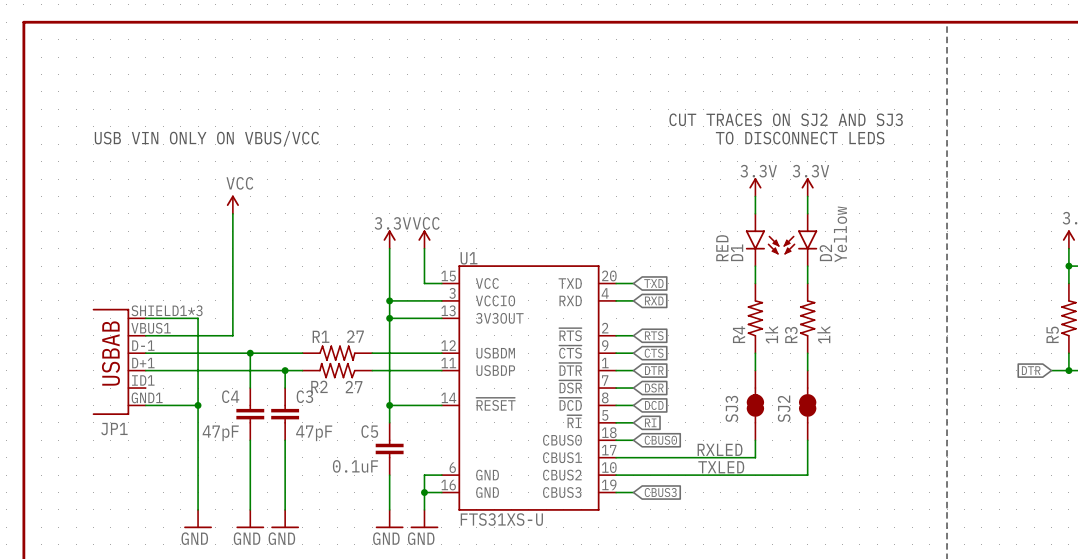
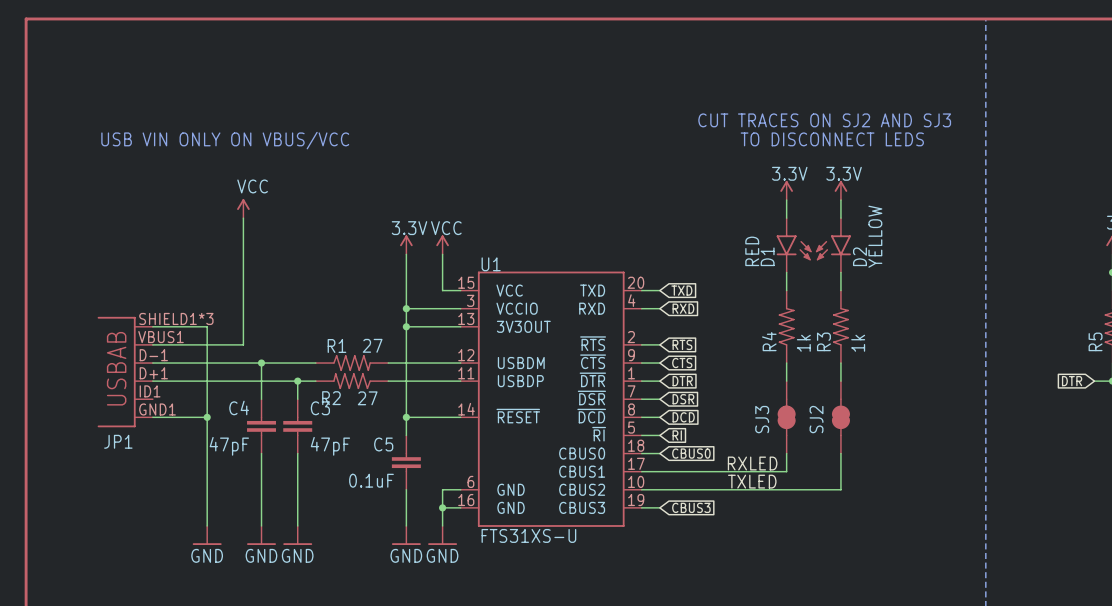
D2 value: Yellow (840, 234) -> YELLOW (875, 236)

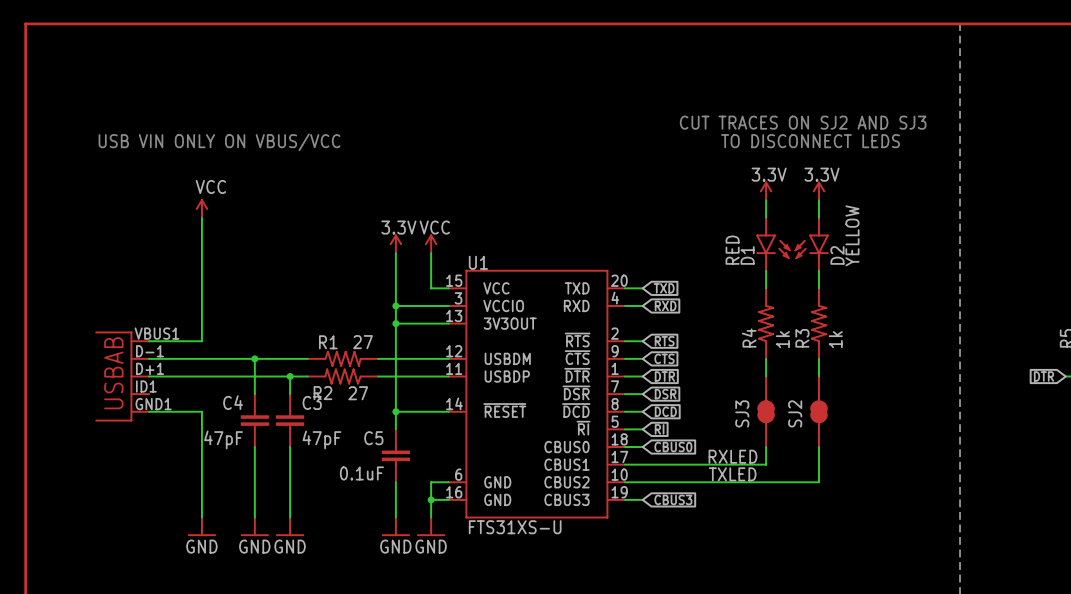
power symbol position: VCC (243, 208) -> VCC (201, 208)
wire: (243, 218) (243, 344) (207, 344) (207, 417) -> none
wire: (152, 326) (207, 326) -> (201, 217) (201, 323)
JP1: (125, 372) -> none
part: none -> (122, 376)
junction: (207, 417) -> none

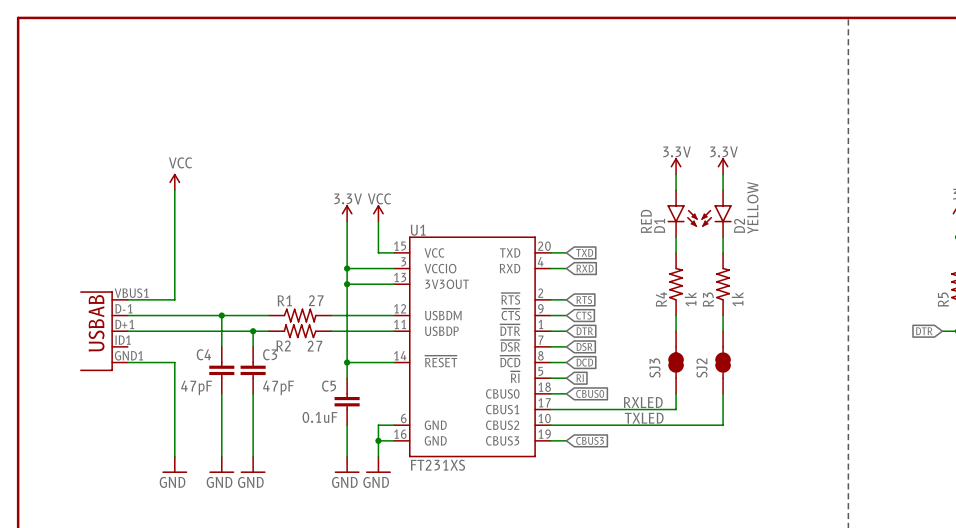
text: CUT TRACES ON SJ2 AND SJ3 (803, 122) -> none
text: TO DISCONNECT LEDS (810, 141) -> none
text: USB VIN ONLY ON VBUS/VCC (219, 142) -> none
U1 value: FTS31XS-U (515, 527) -> FT231XS (437, 465)

